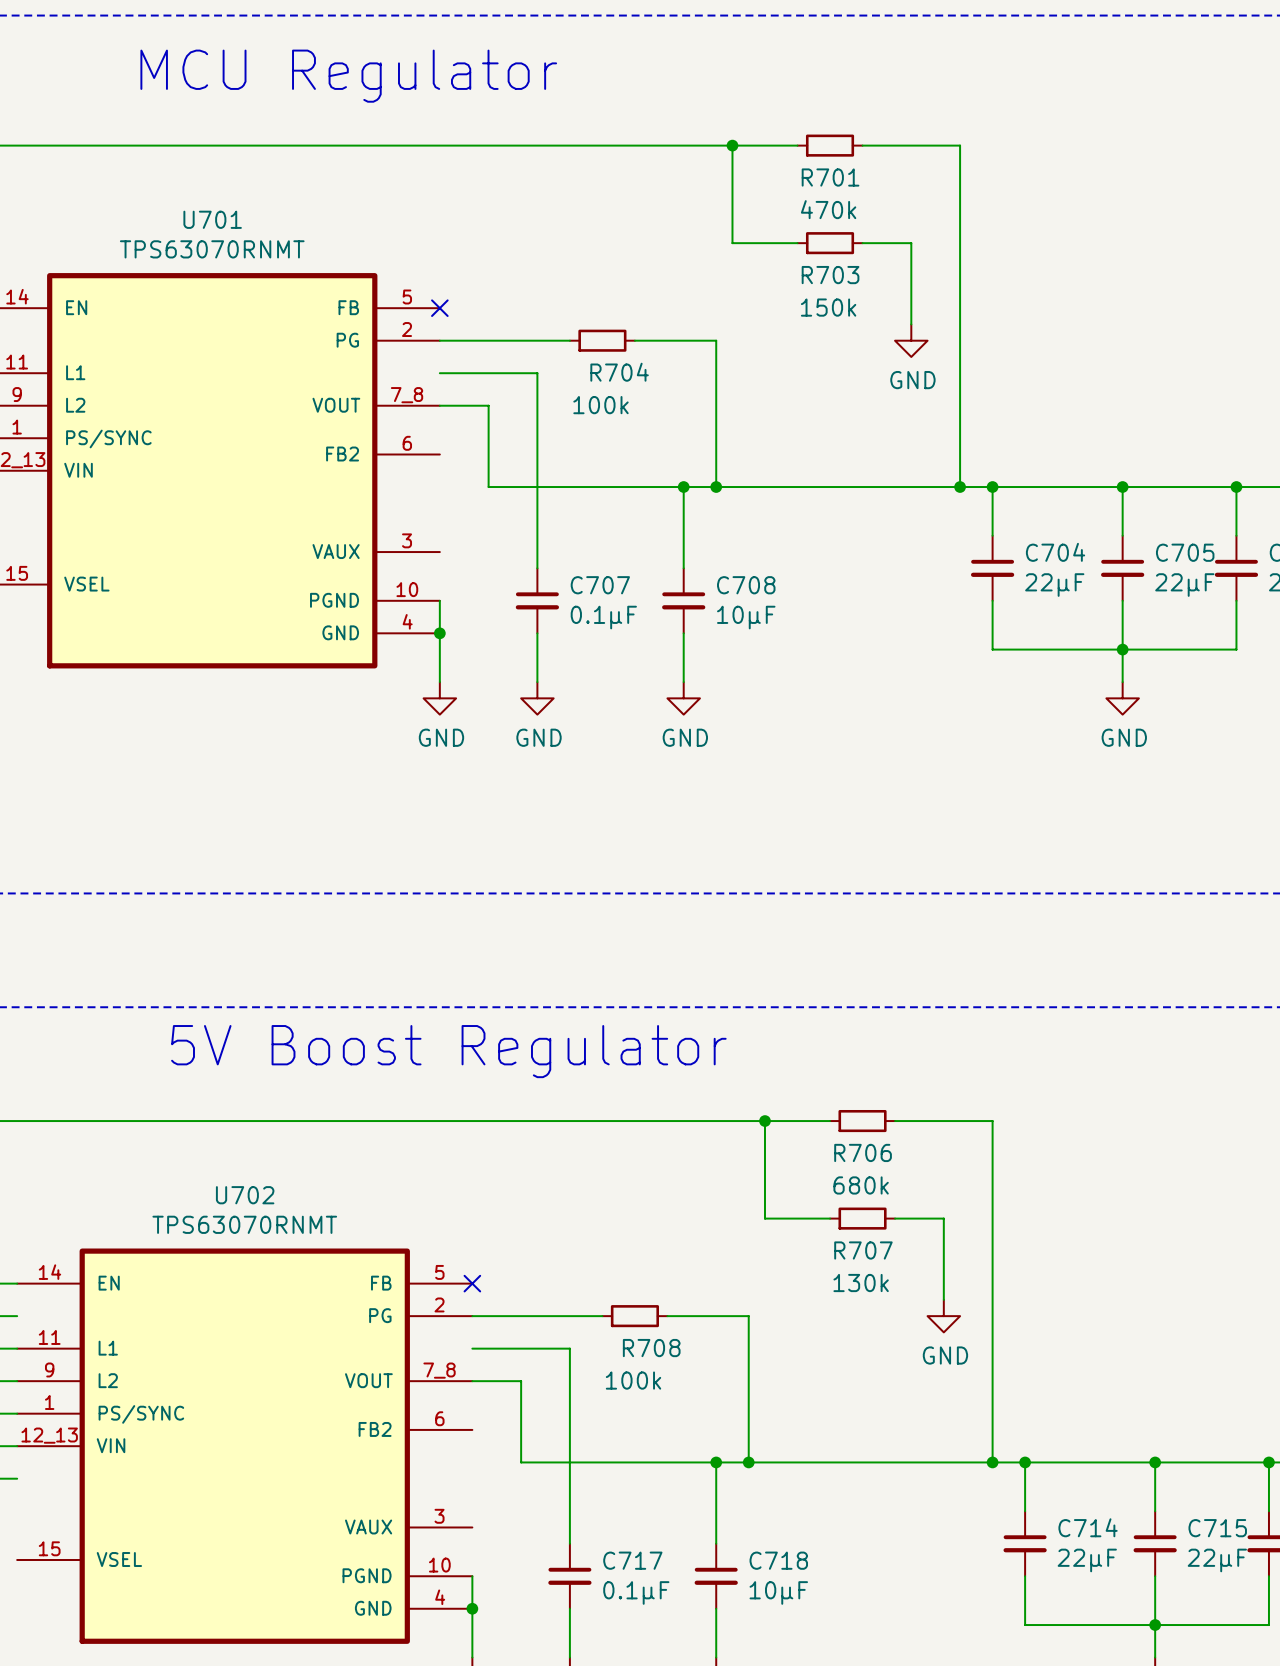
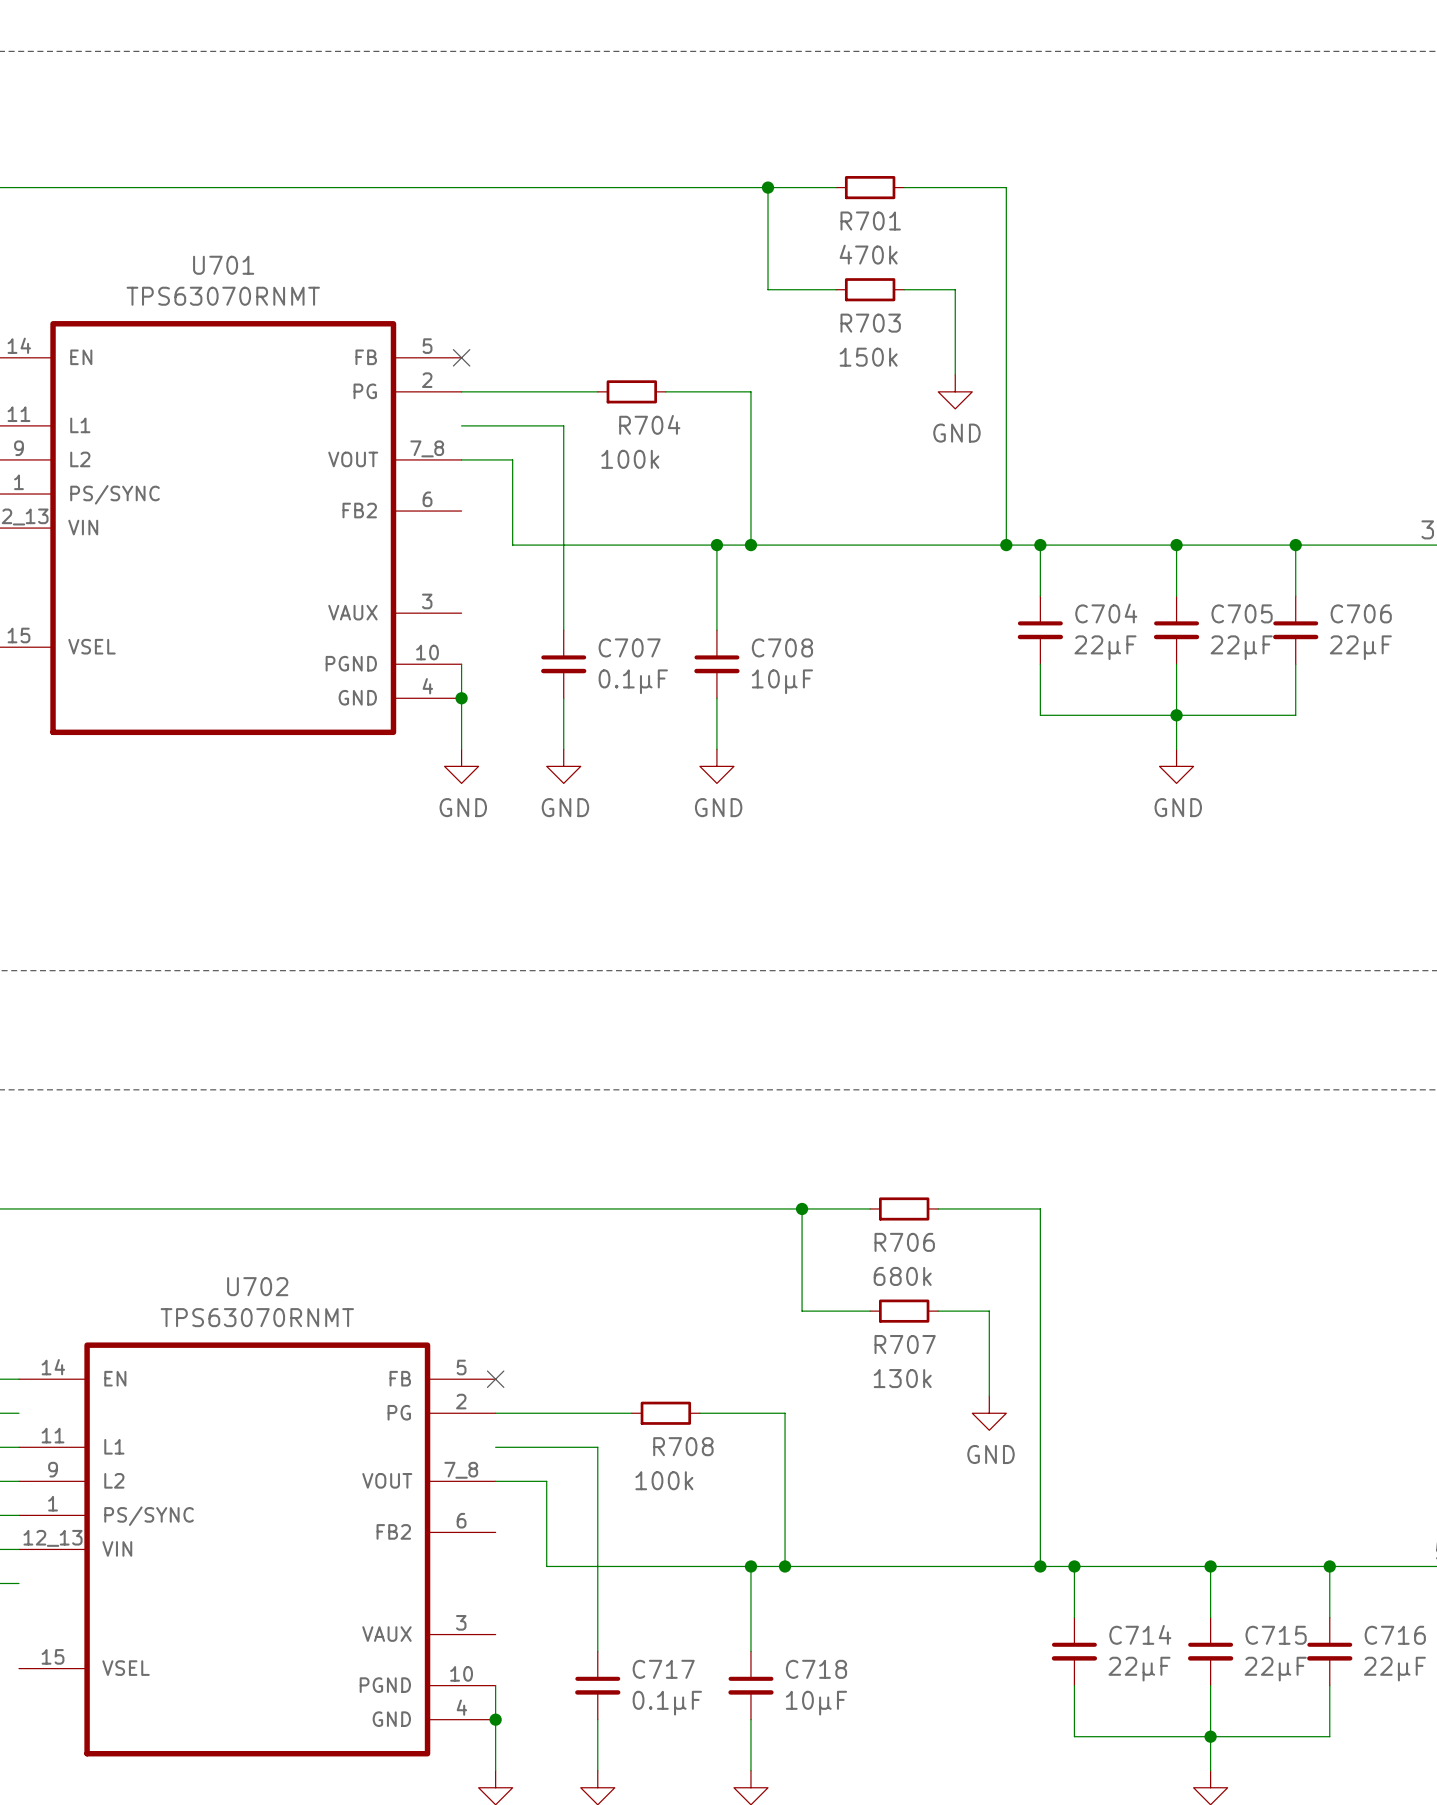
text: MCU Regulator (348, 76) -> none
text: 5V Boost Regulator (448, 1051) -> none

